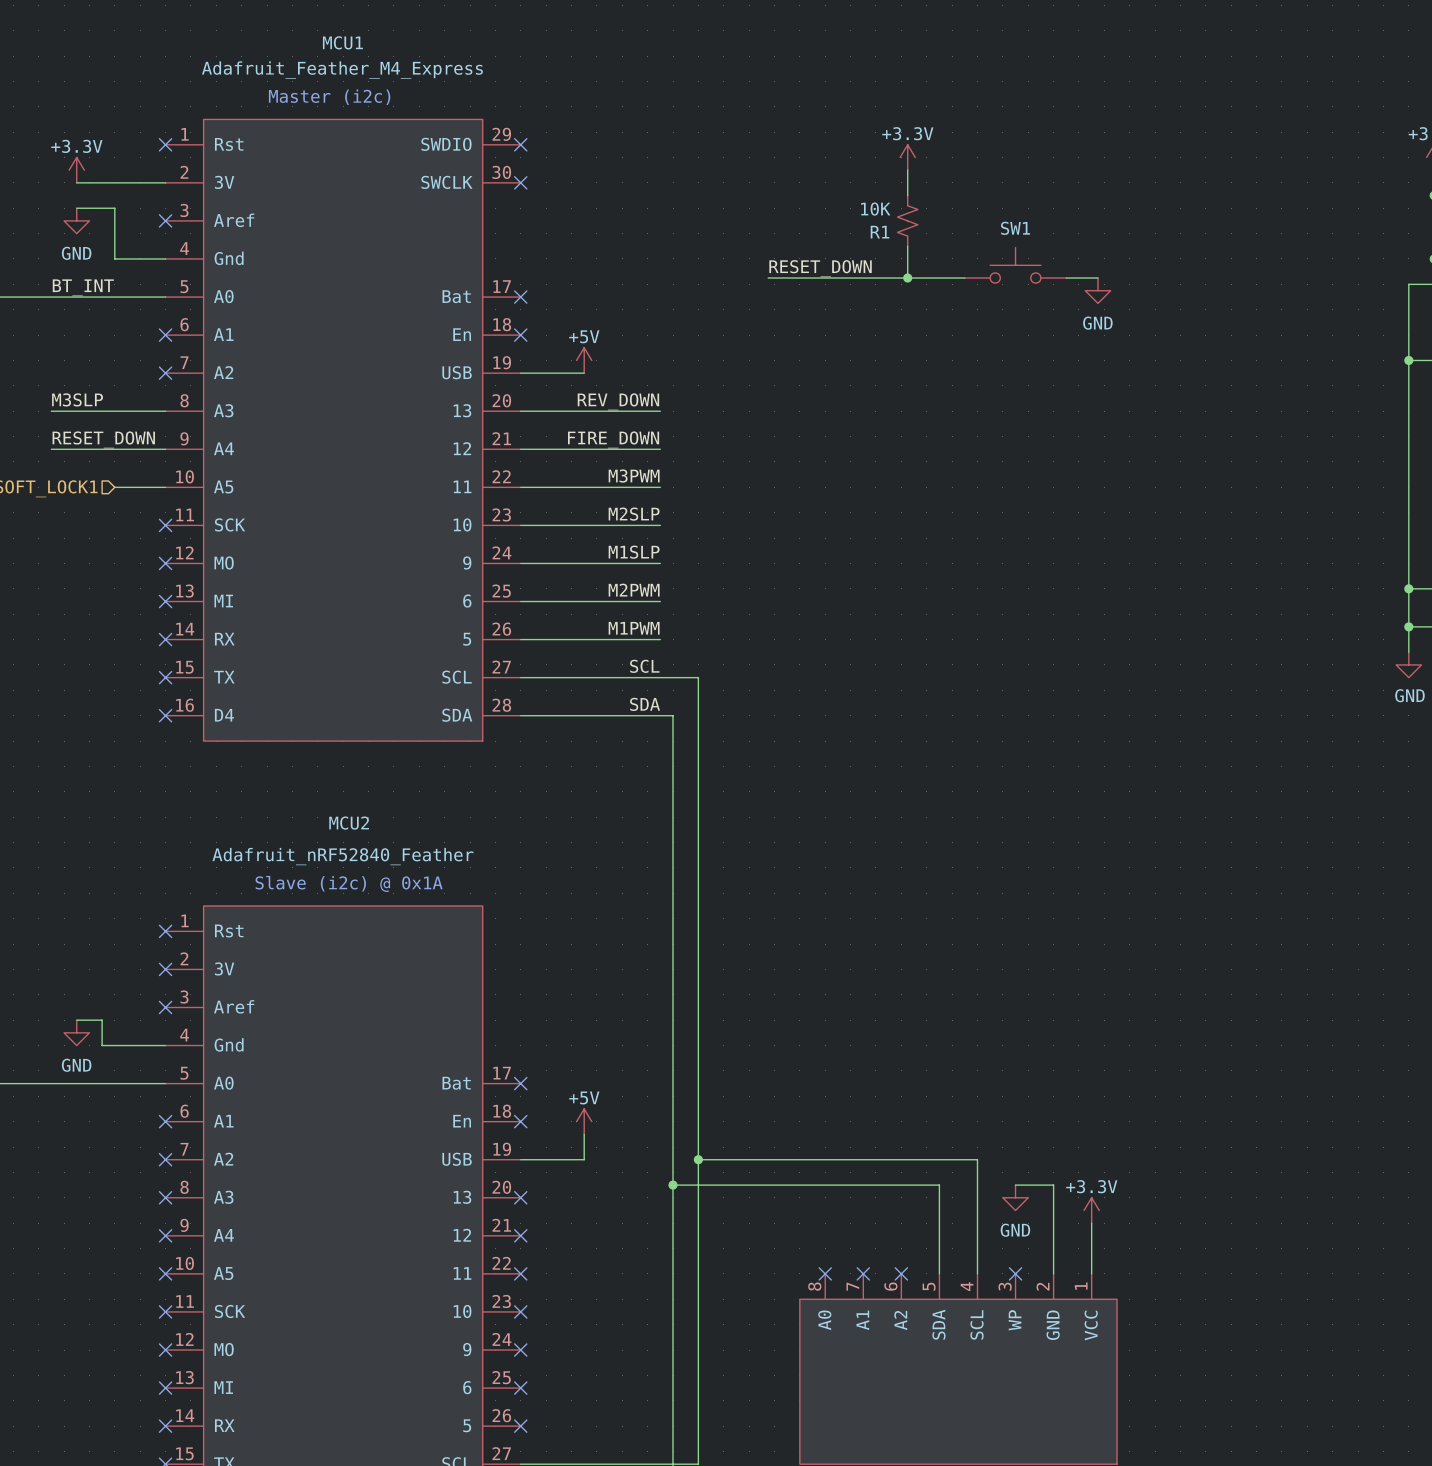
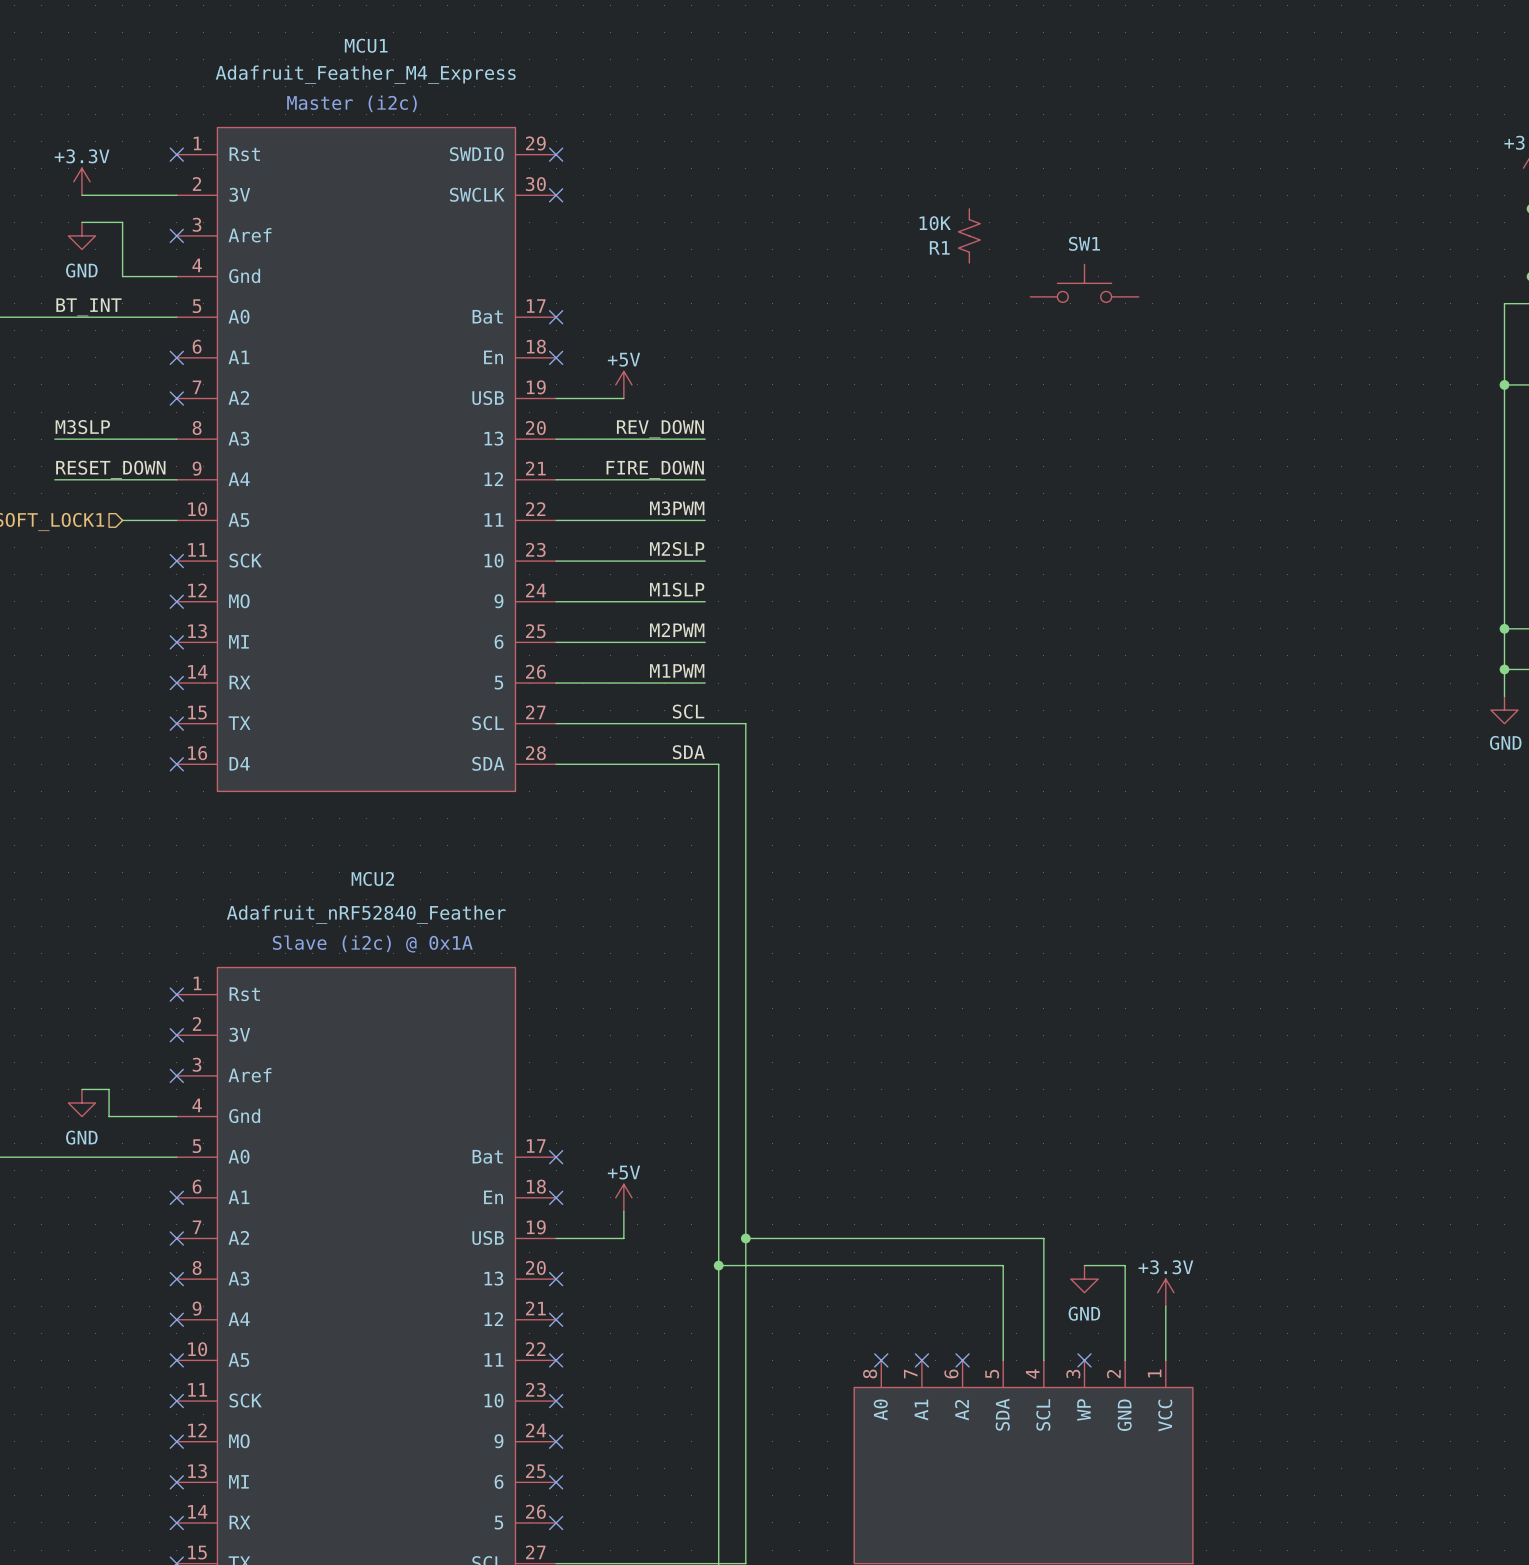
power symbol: +3.3V (907, 157) -> none
wire: (907, 170) (907, 195) -> none
wire: (907, 246) (907, 278) -> none
label: RESET_DOWN (820, 268) -> none
wire: (768, 278) (964, 278) -> none
junction: (907, 278) -> none
wire: (1066, 278) (1098, 278) -> none
power symbol: GND (1098, 290) -> none

